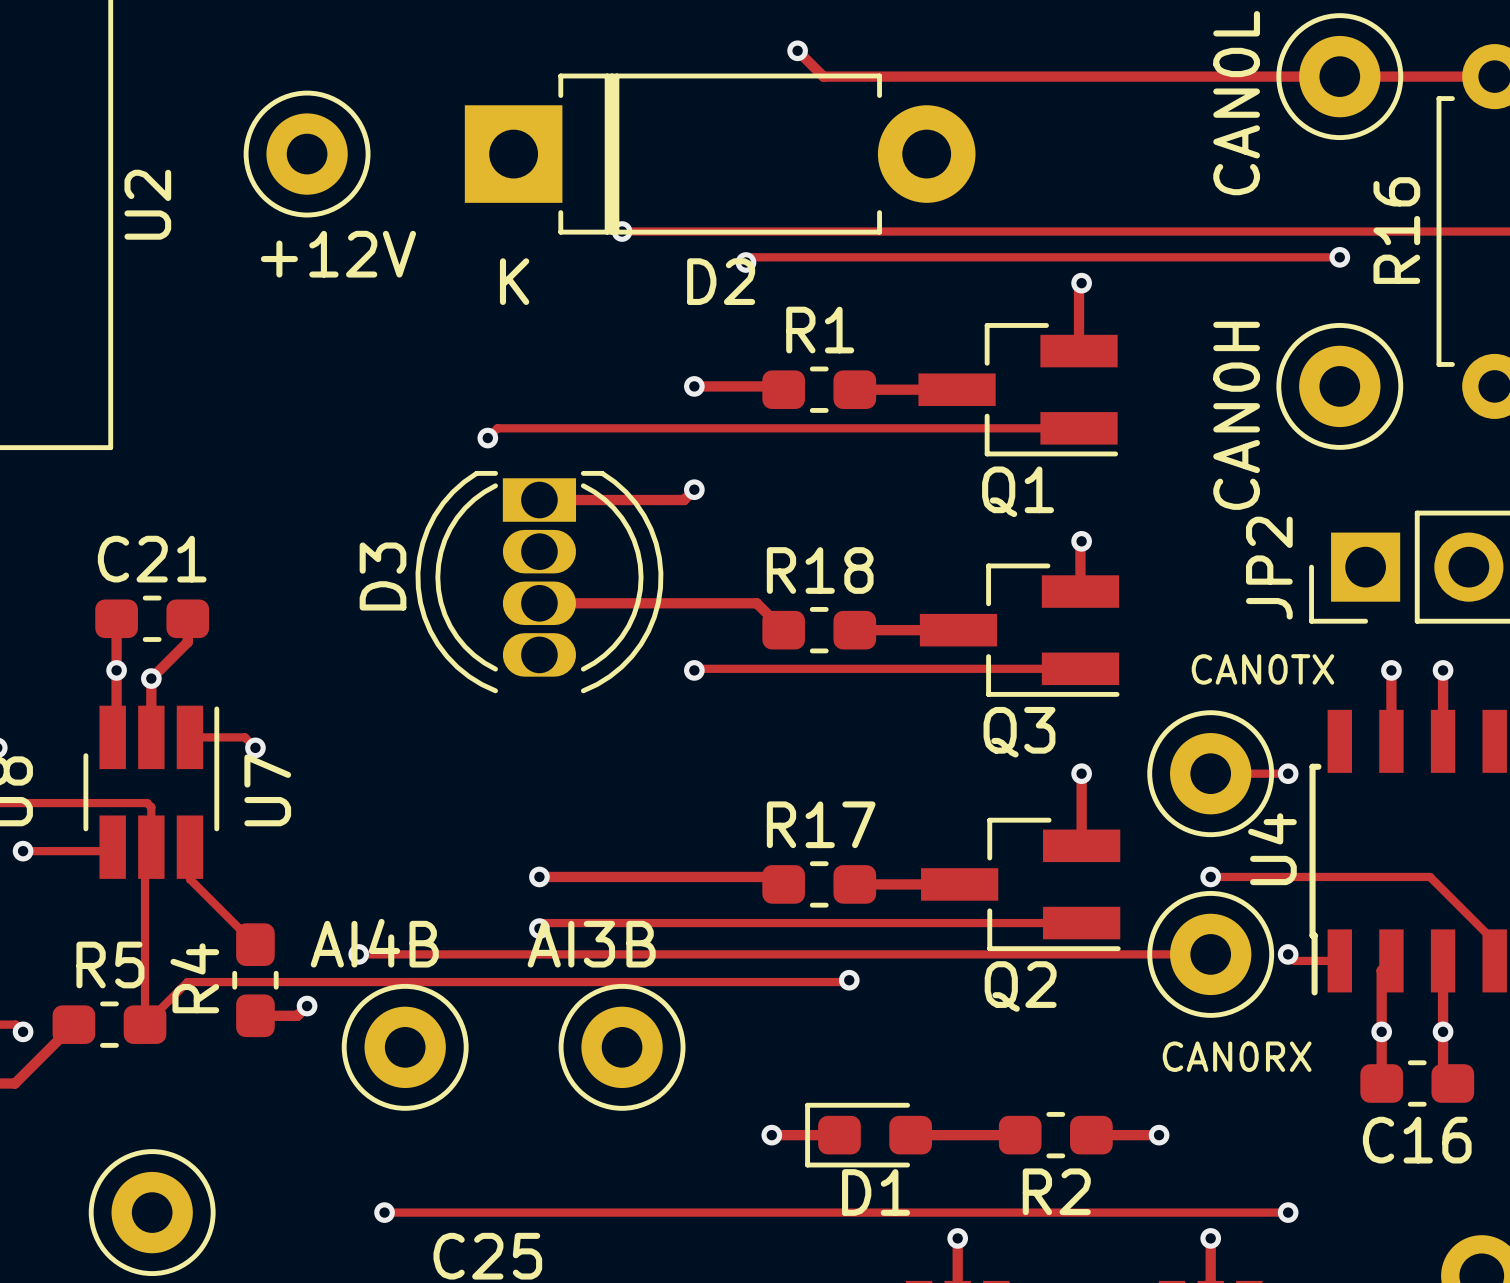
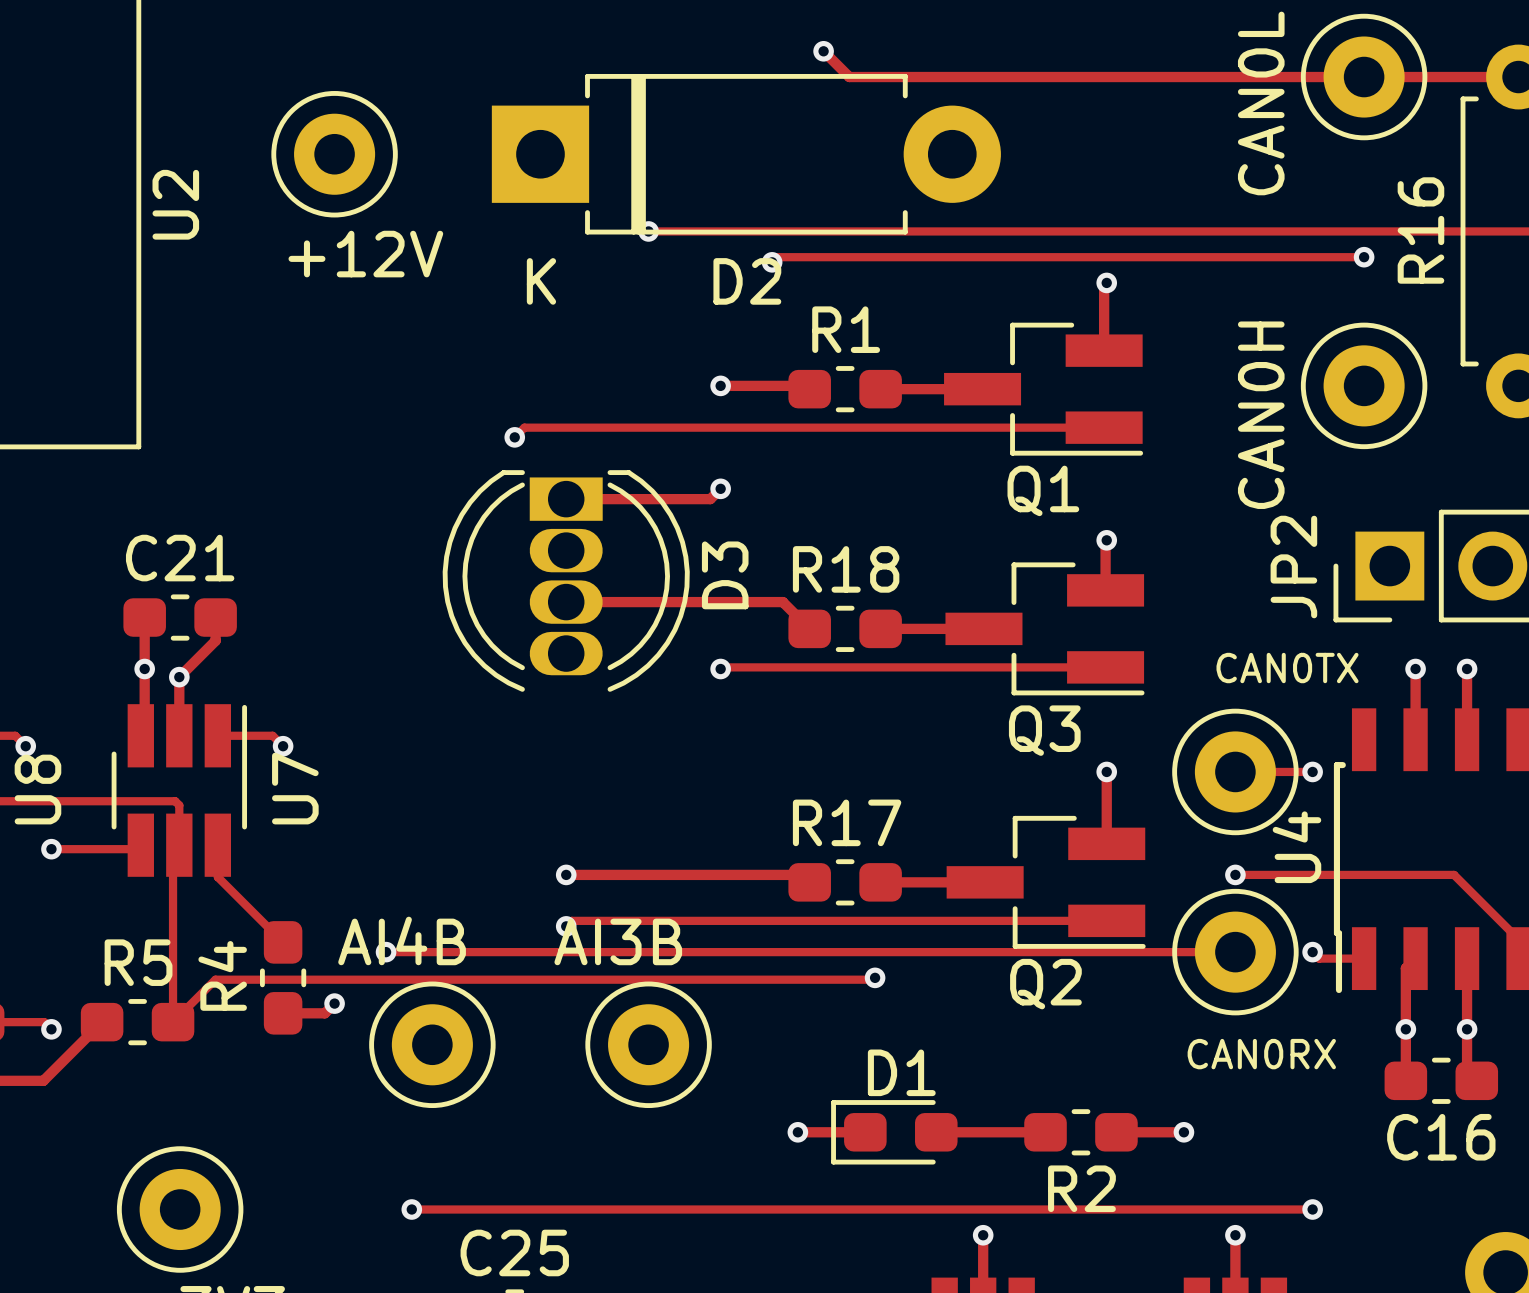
D3 name position: D3 (383, 576) -> D3 (725, 575)
D1 name position: D1 (876, 1192) -> D1 (901, 1072)

